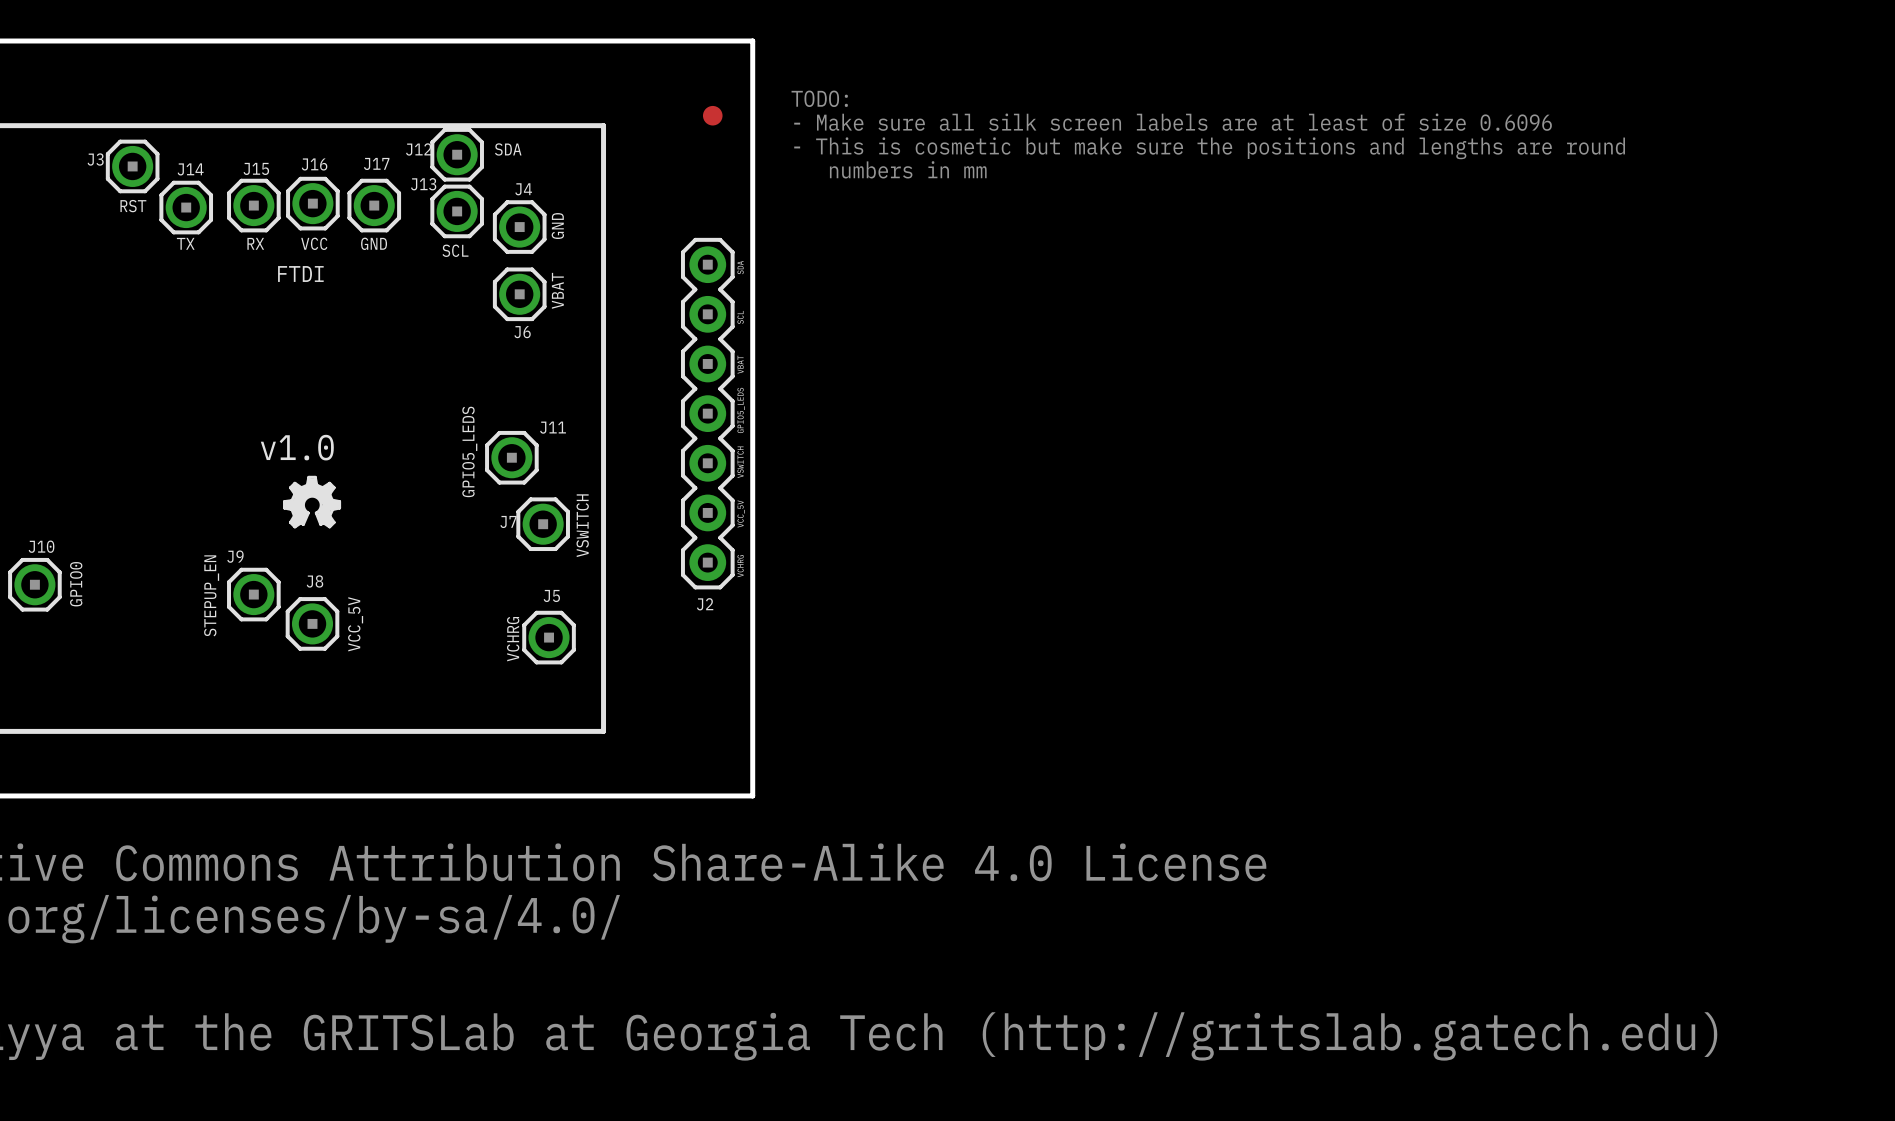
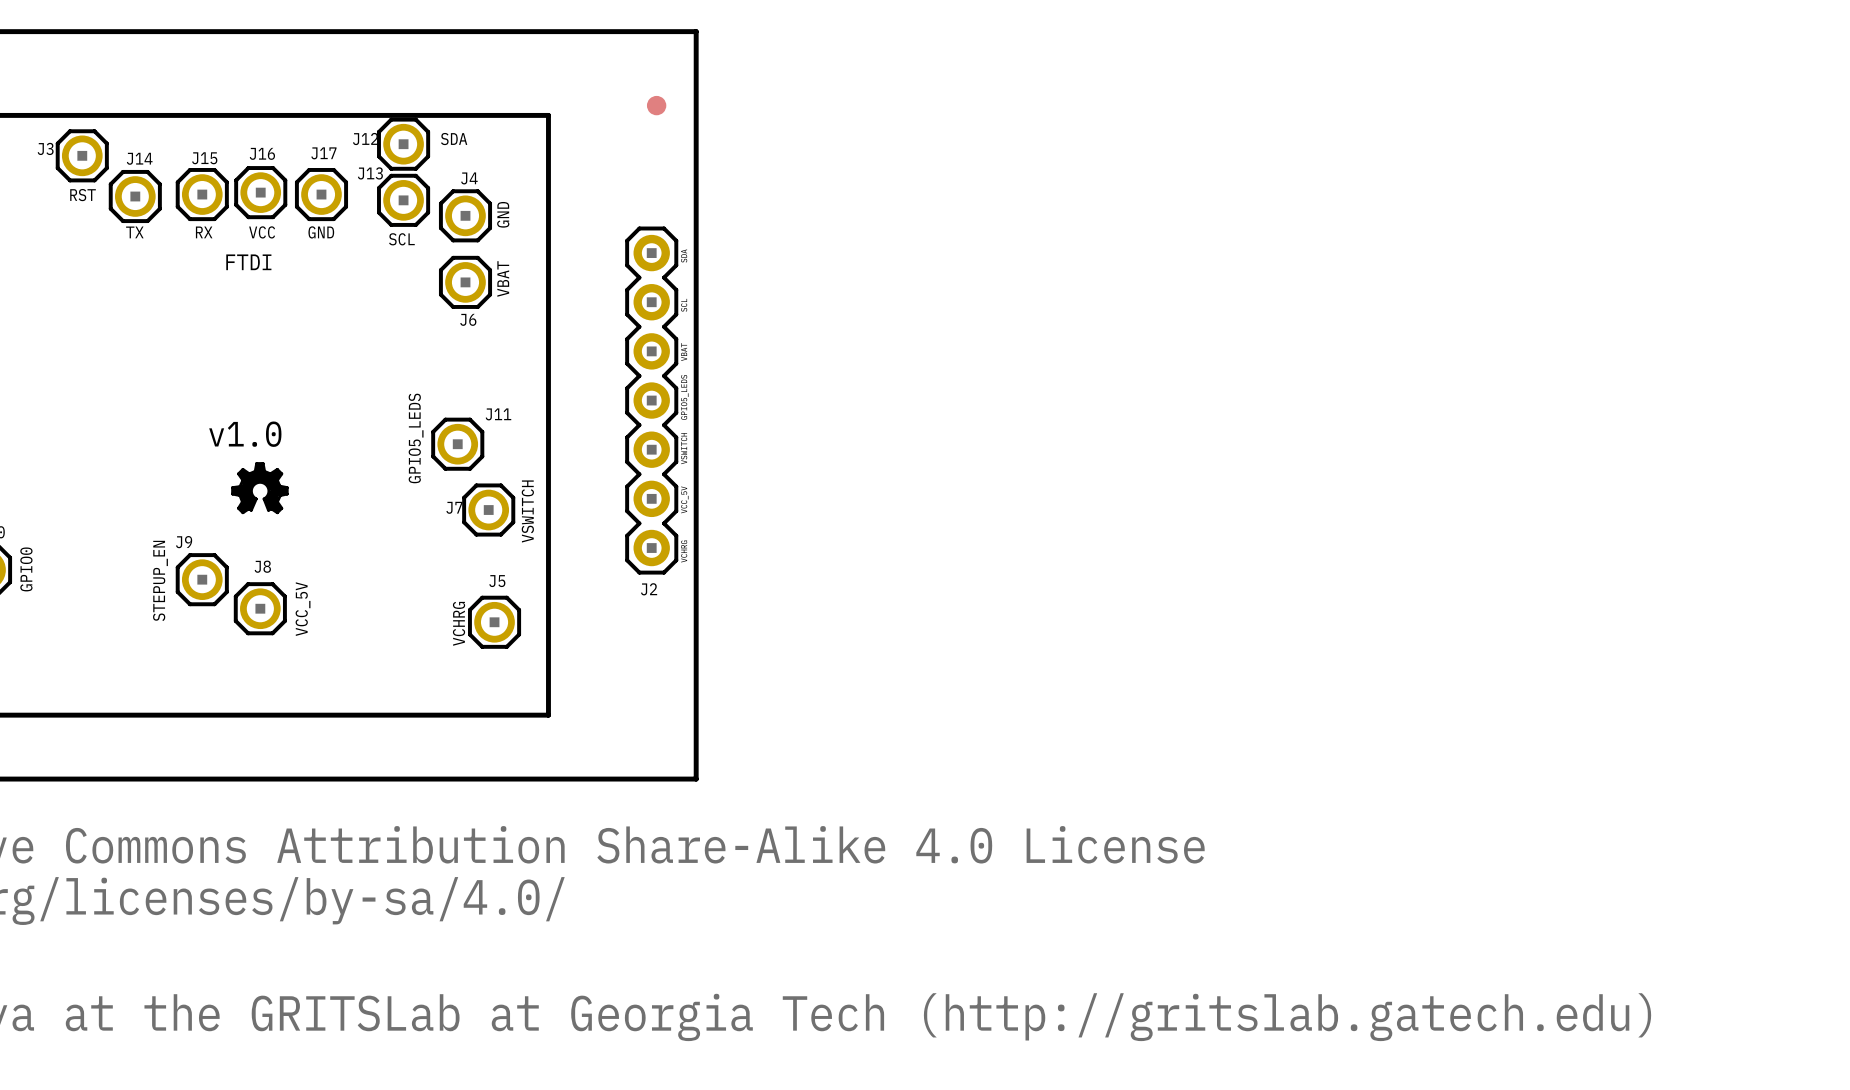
text: TODO: (819, 98) -> none
text: - Make sure all silk screen labels are at least of size 0.6096 (1173, 122) -> none
text: - This is cosmetic but make sure the positions and lengths are round (1209, 148) -> none
text: numbers in mm (908, 169) -> none

